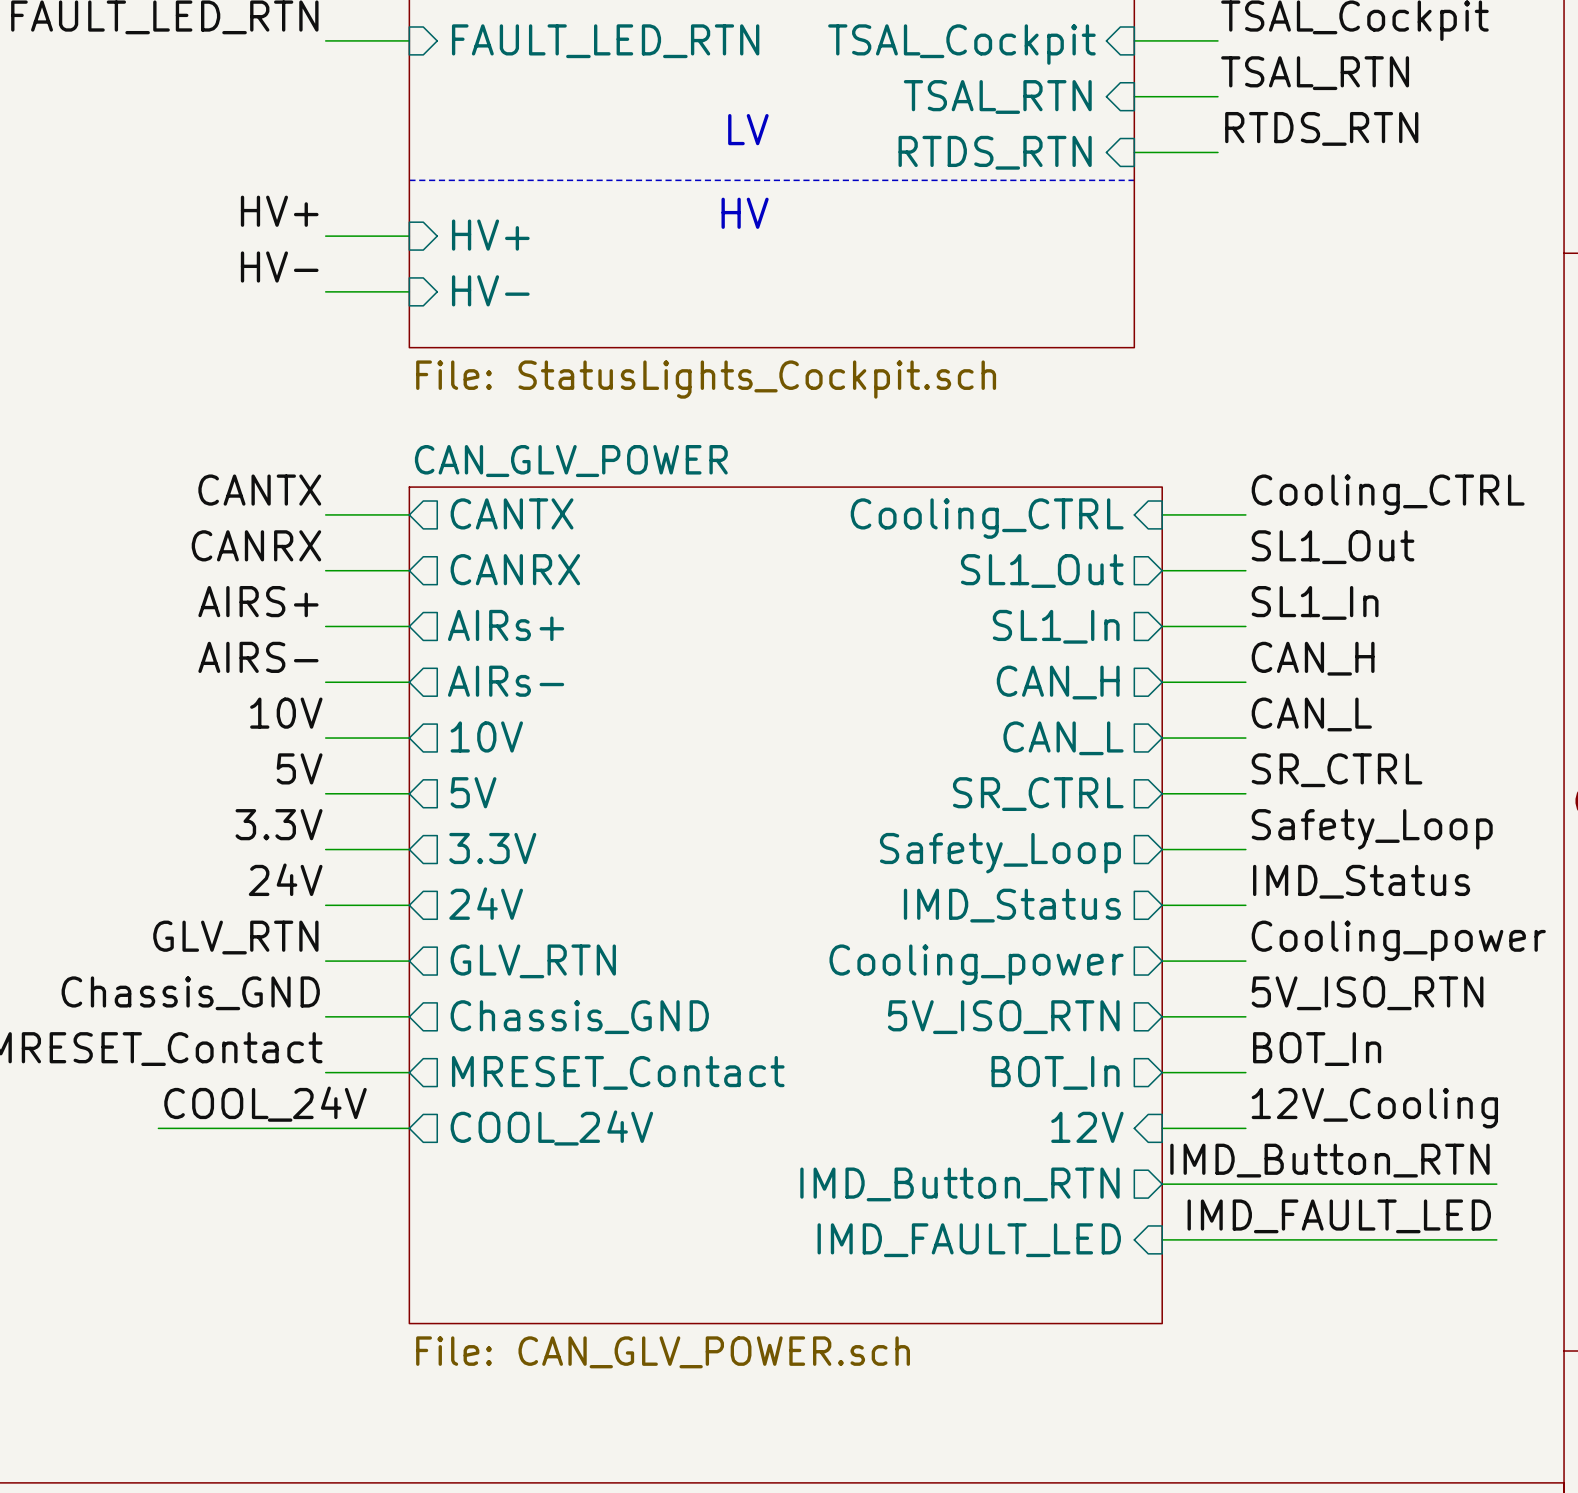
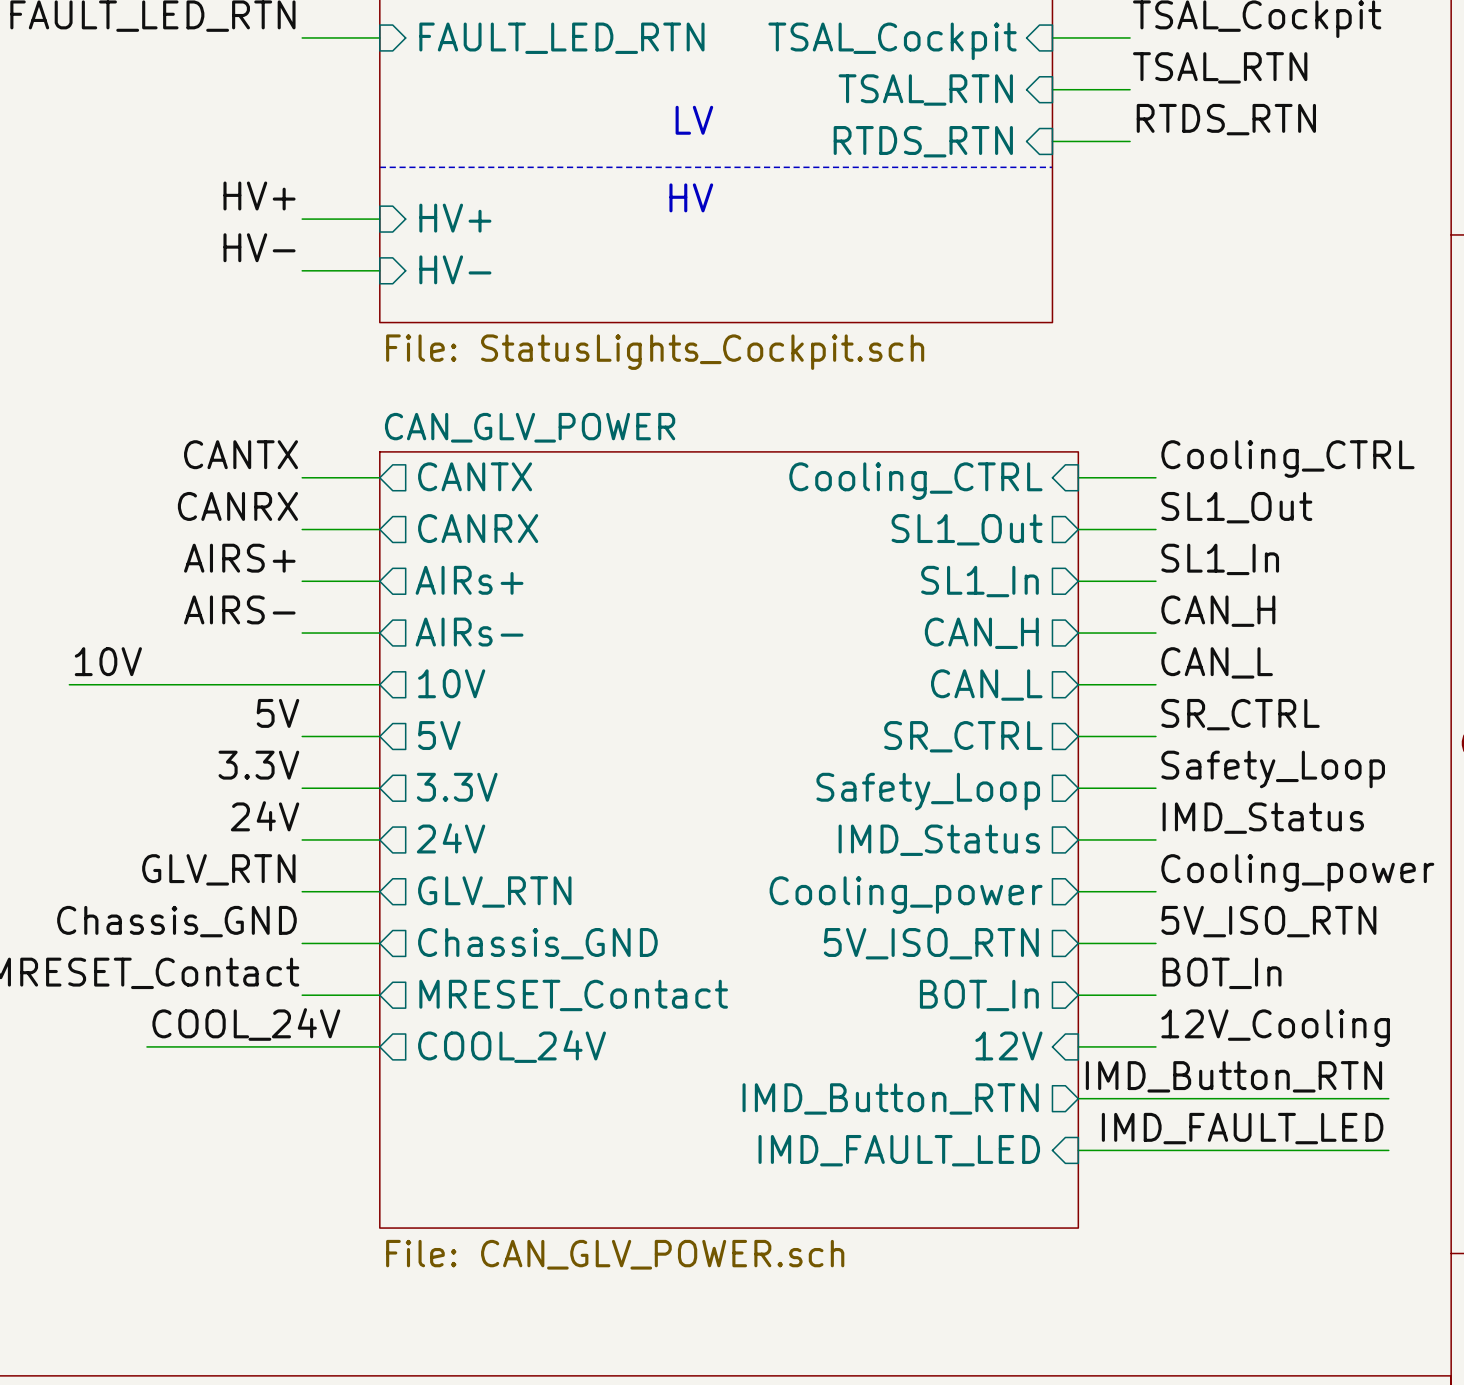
label position: 10V (286, 713) -> 10V (108, 661)
wire: none -> (69, 684) (302, 684)

